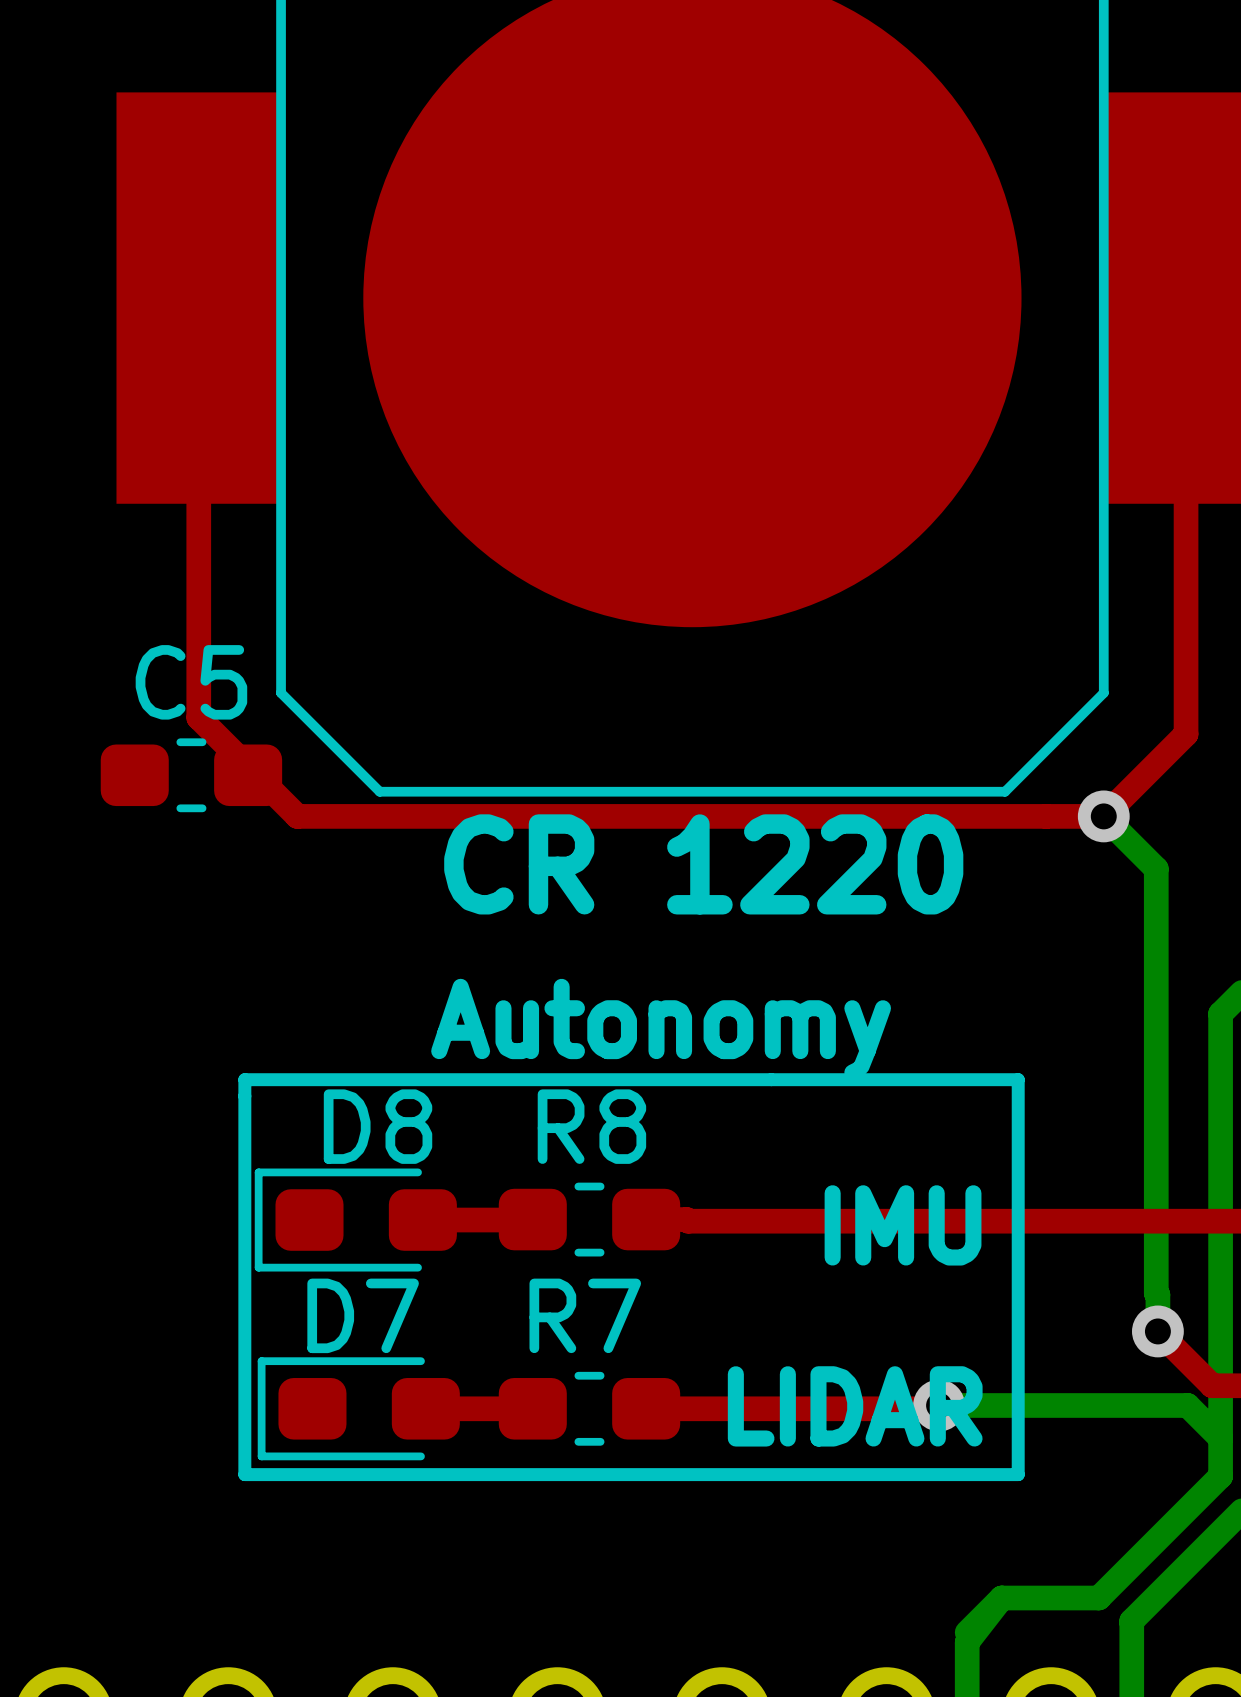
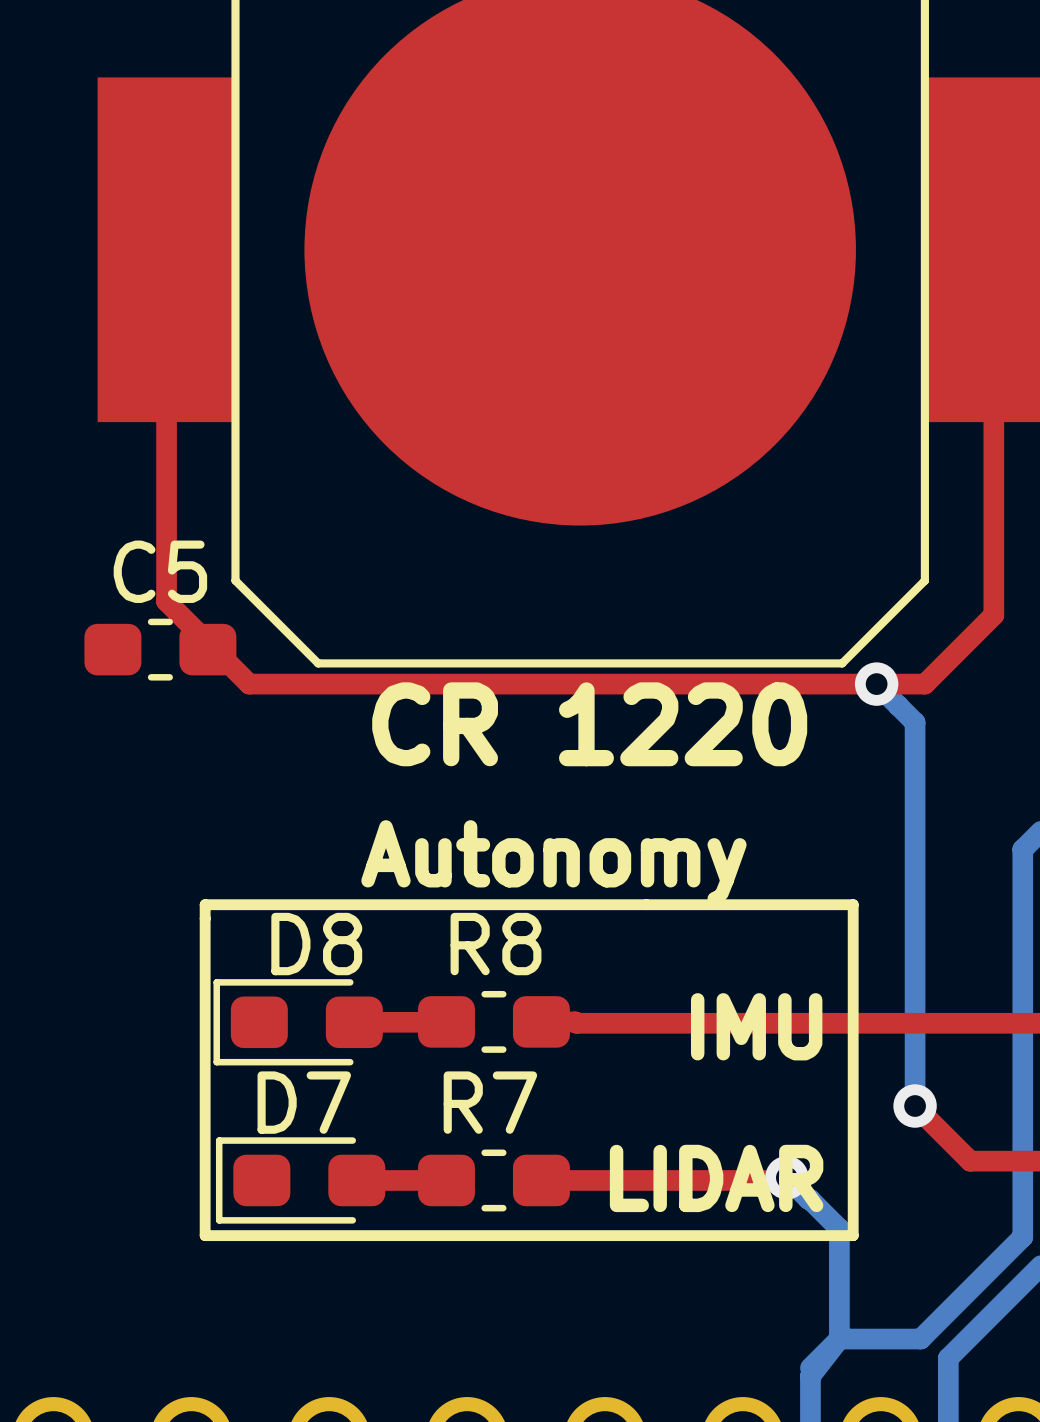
bottom track: none -> (876, 684) (915, 722) (915, 1106)
bottom track: (1103, 816) (1156, 868) (1156, 1293) (1157, 1294) (1157, 1331) -> none
via position: (1103, 816) -> (876, 684)
top track: (1157, 1331) (1212, 1385) -> (915, 1106) (970, 1161) (1015, 1161)
via position: (1157, 1331) -> (915, 1106)
bottom track: (939, 1405) (1187, 1405) (1220, 1438) -> (786, 1177) (839, 1228) (839, 1339)

